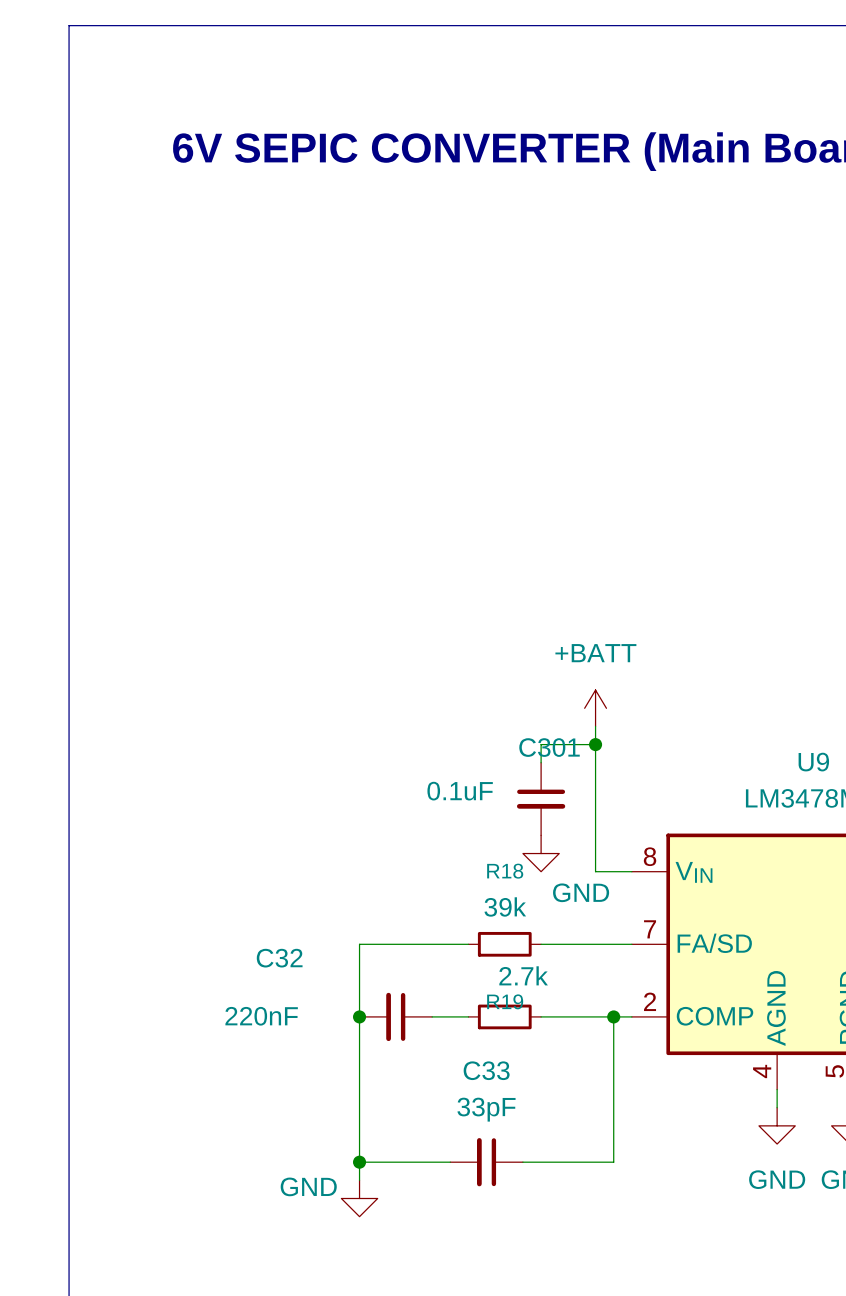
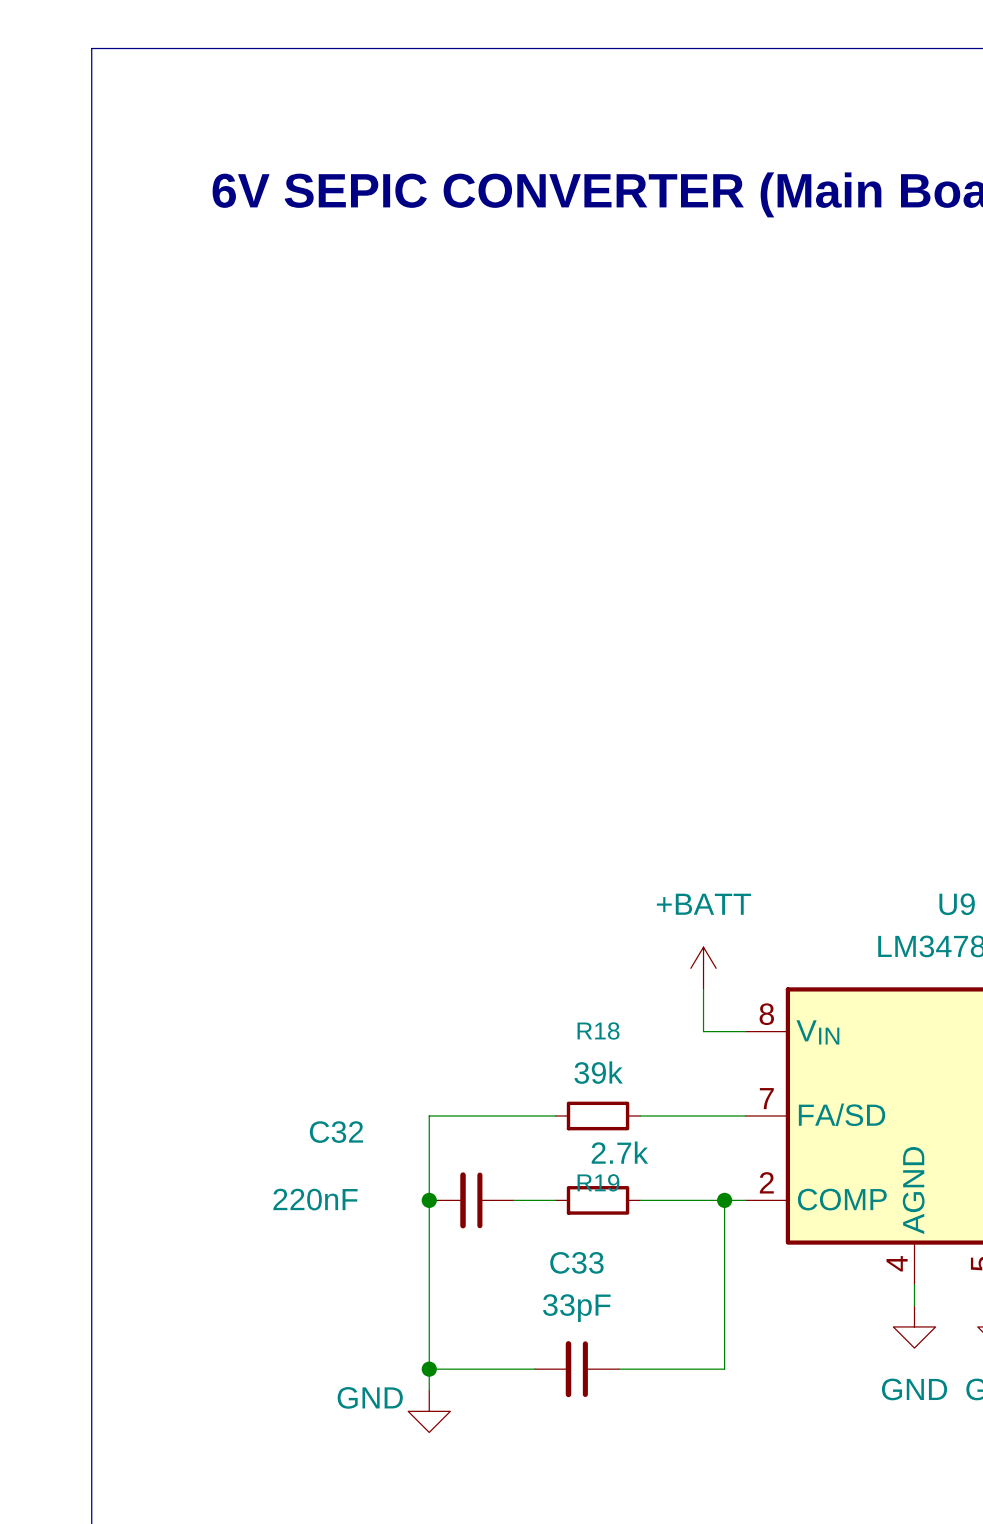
power symbol position: +BATT (595, 708) -> +BATT (703, 968)
wire: (595, 726) (595, 835) -> none
wire: (595, 744) (541, 744) (541, 762) -> none
junction: (595, 744) -> none
C301: 0.1uF (541, 799) -> none
power symbol: GND (541, 853) -> none

